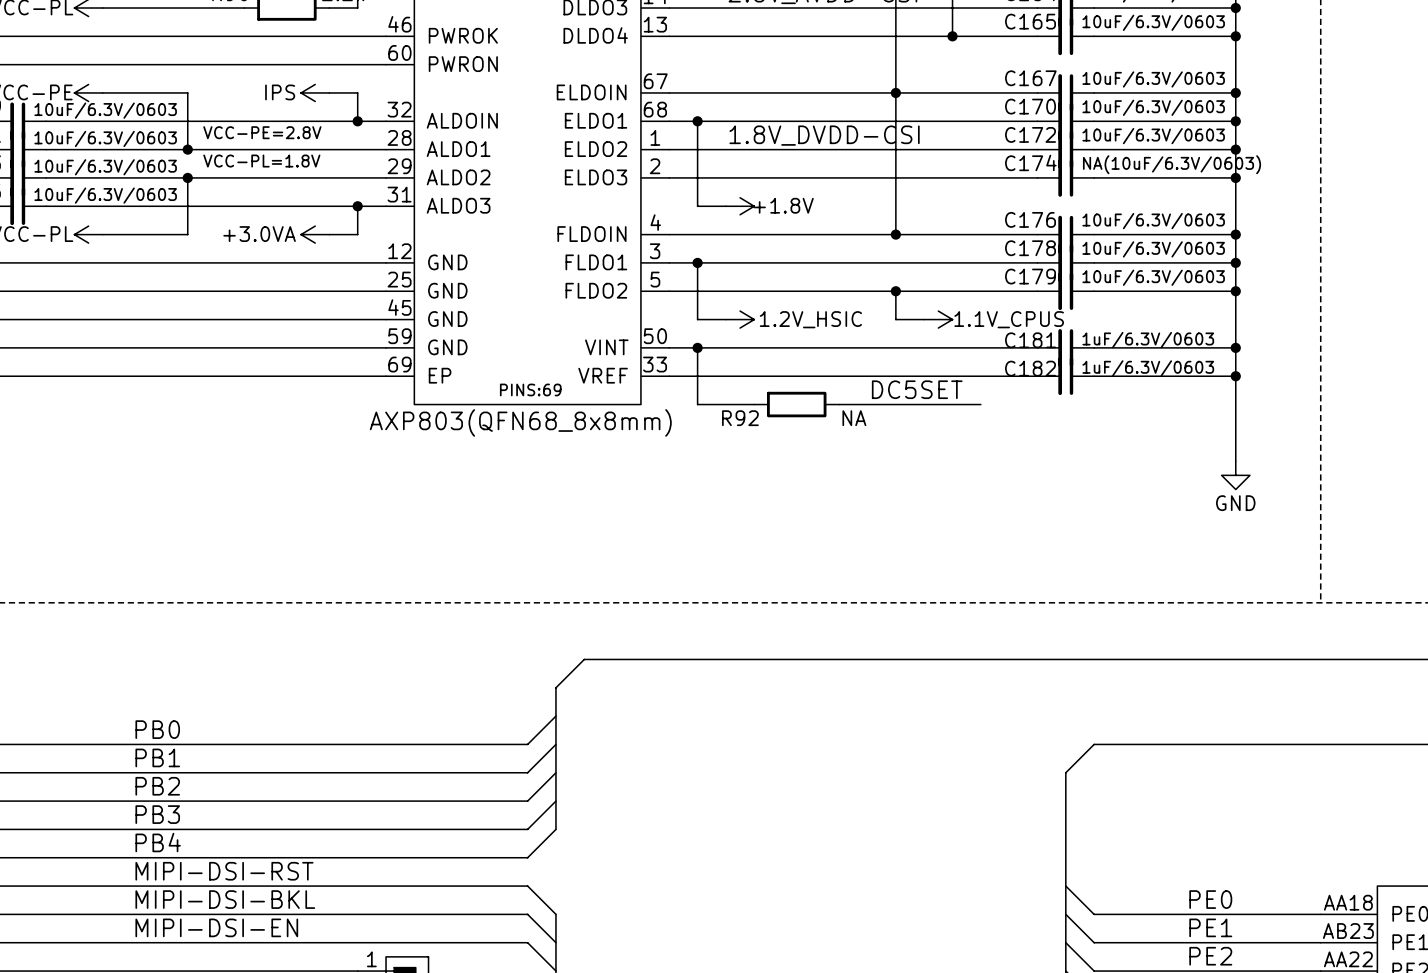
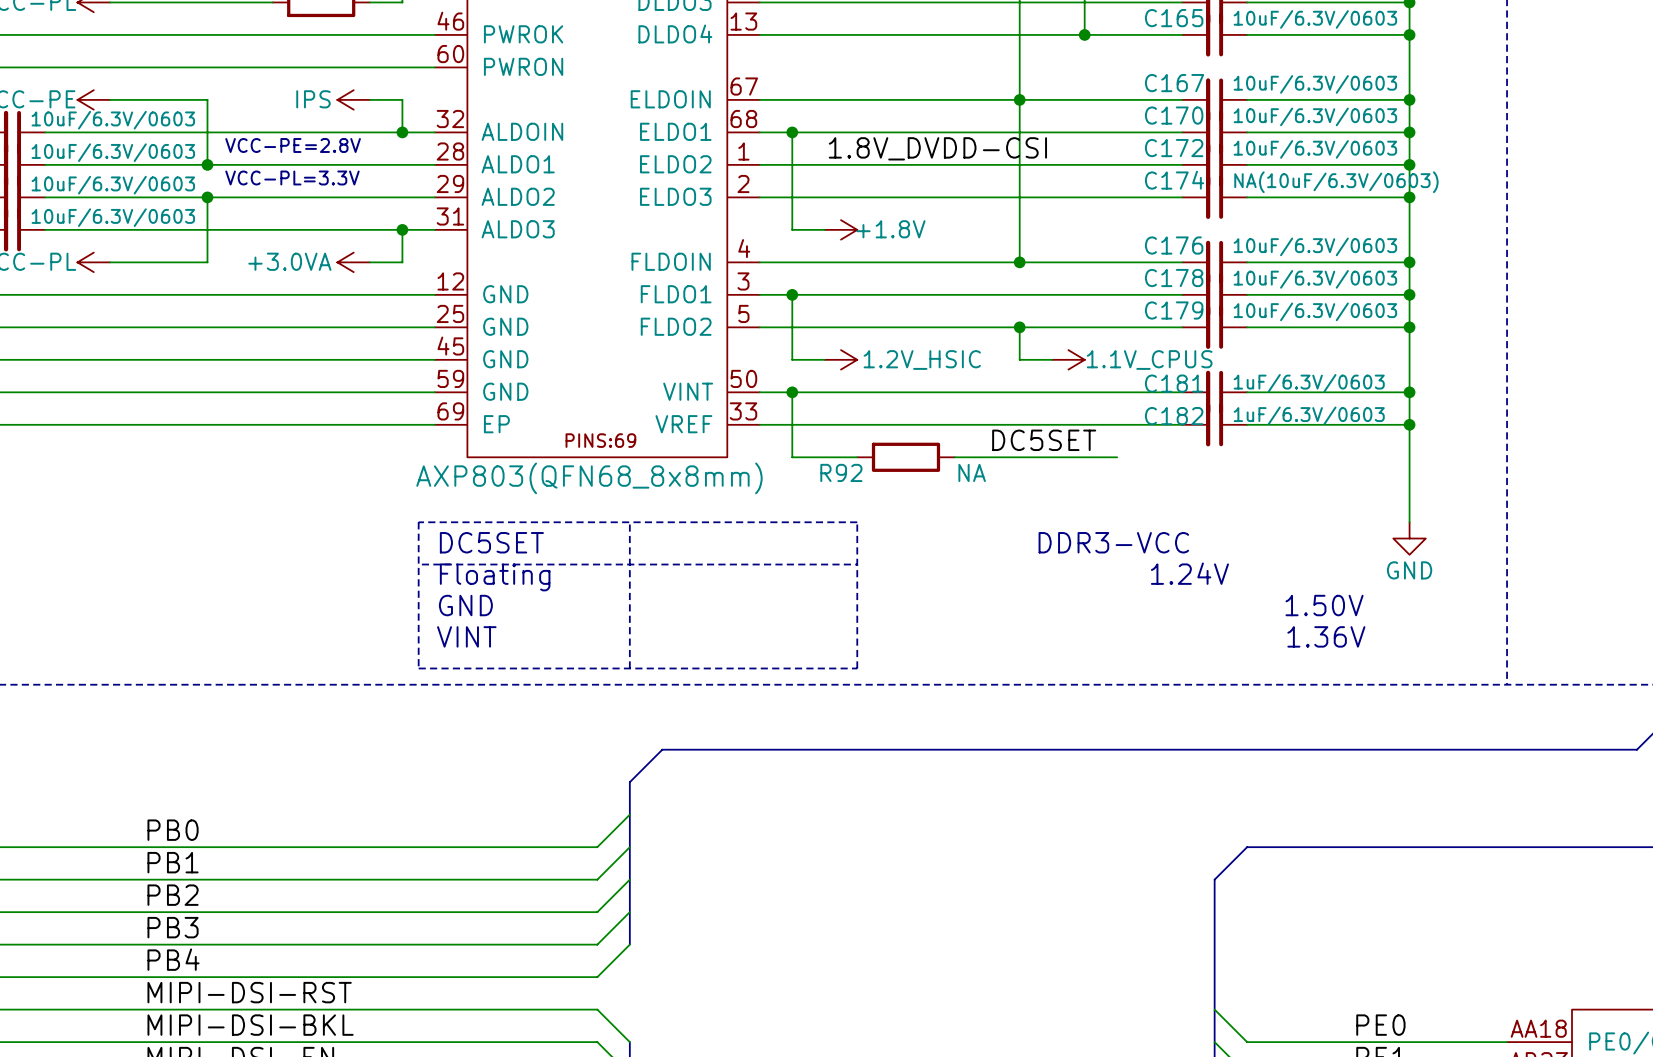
text: VCC-PL=1.8V (261, 161) -> VCC-PL=3.3V (292, 177)
line: none -> (418, 522) (857, 522) (857, 668) (418, 668) (418, 522)
line: none -> (629, 522) (629, 668)
text: none -> DC5SET DDR3-VCC (814, 542)
line: none -> (421, 564) (857, 564)
text: none -> Floating 1.24V (834, 576)
text: none -> GND 1.50V (901, 605)
text: none -> VINT 1.36V (901, 636)

